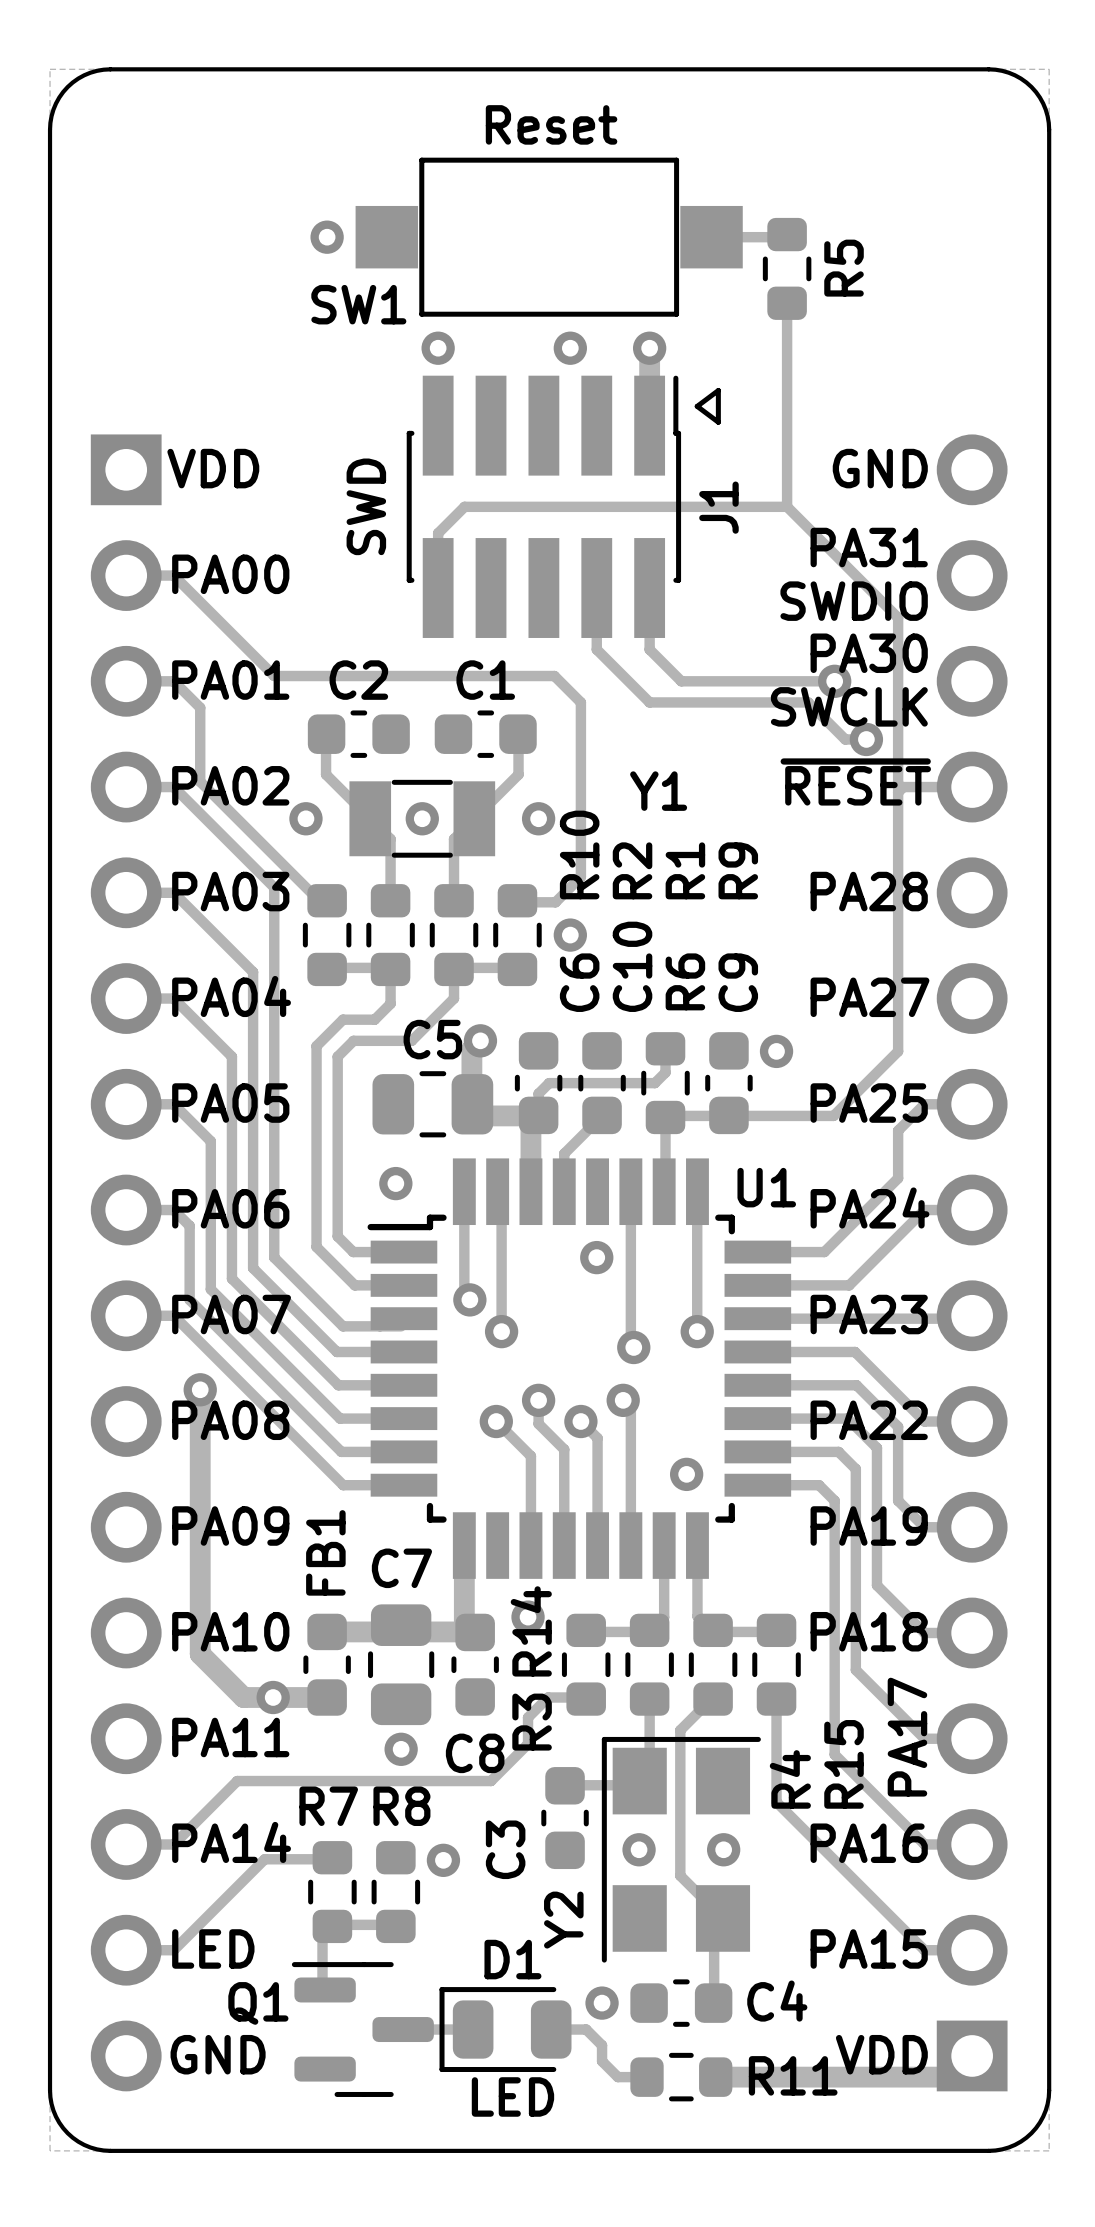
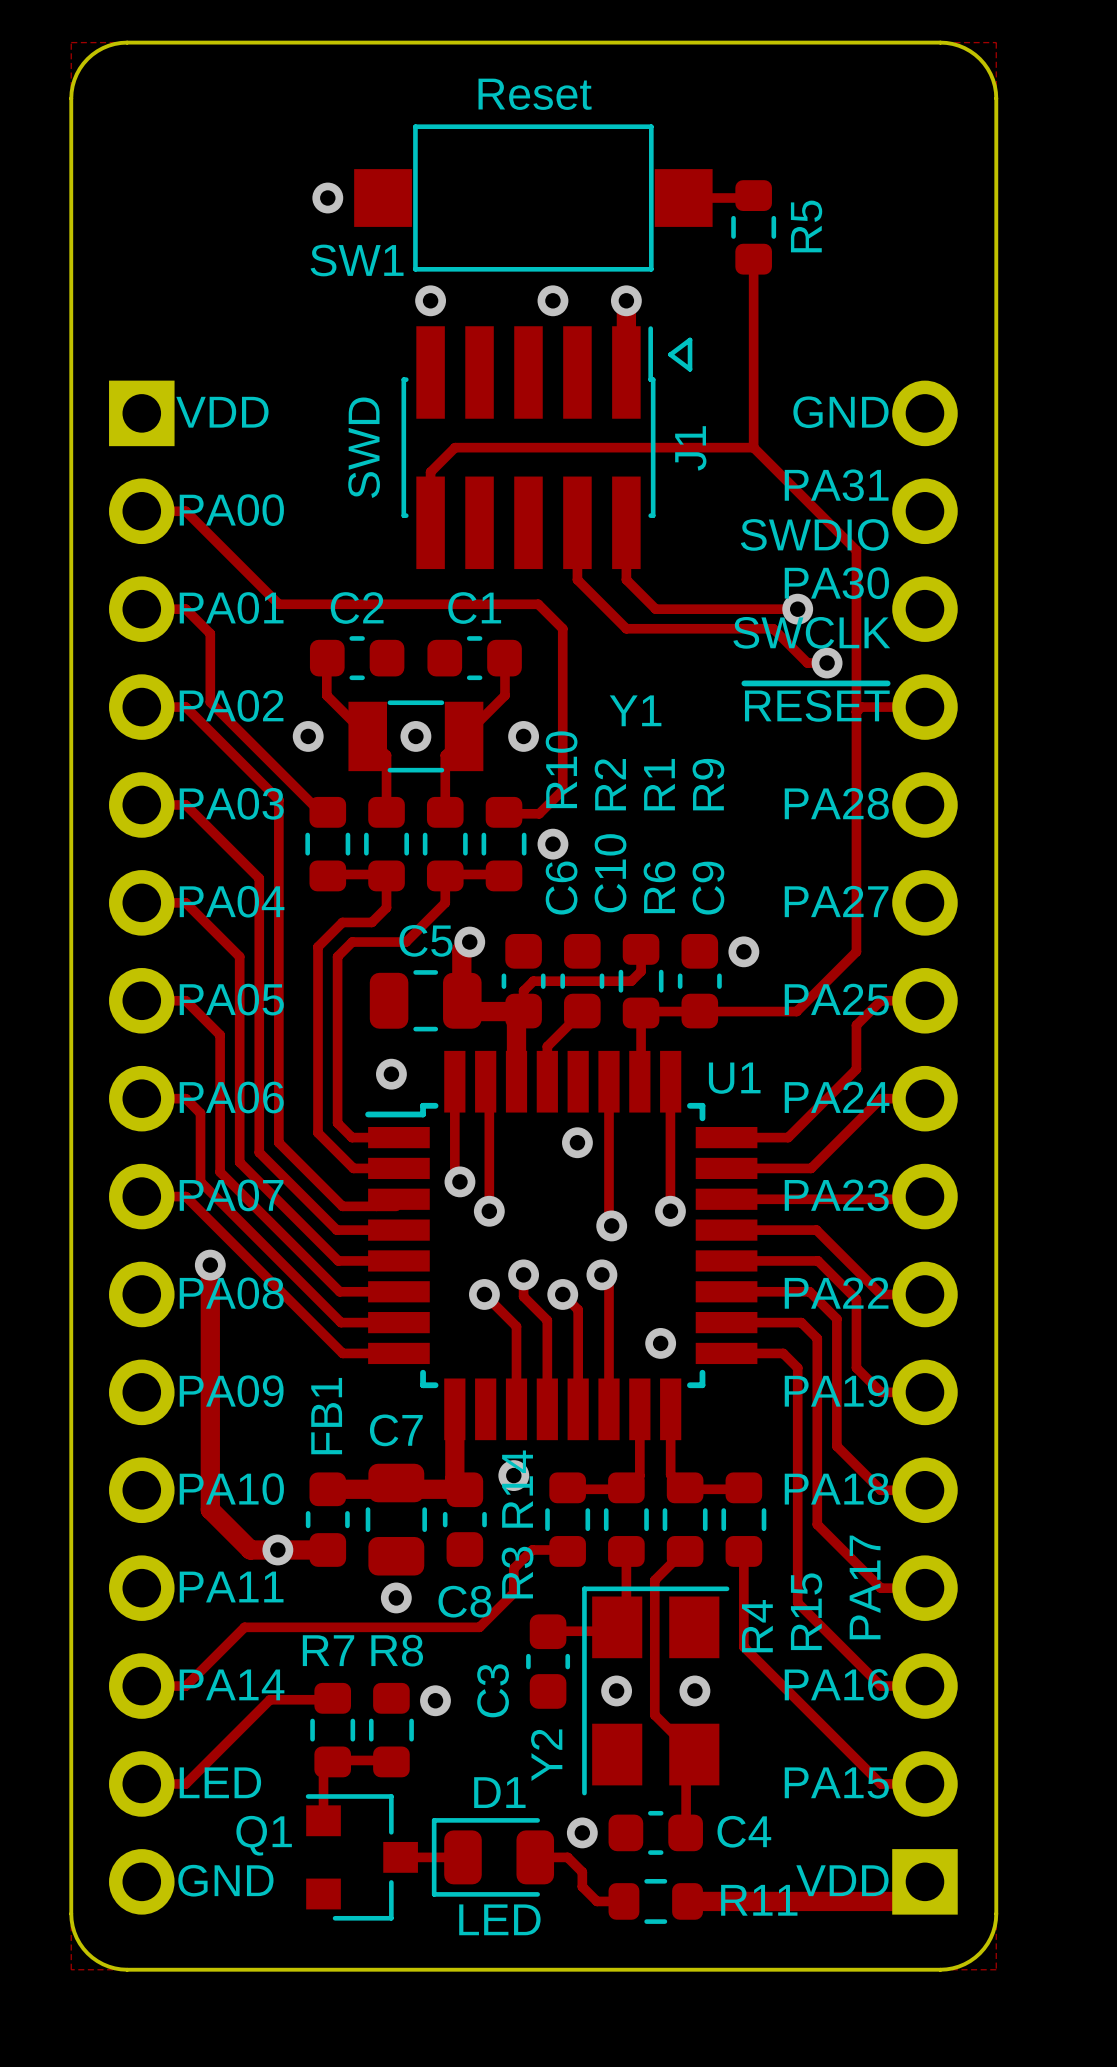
Q1 footprint: [291, 1962, 434, 2097] -> [305, 1794, 418, 1921]

